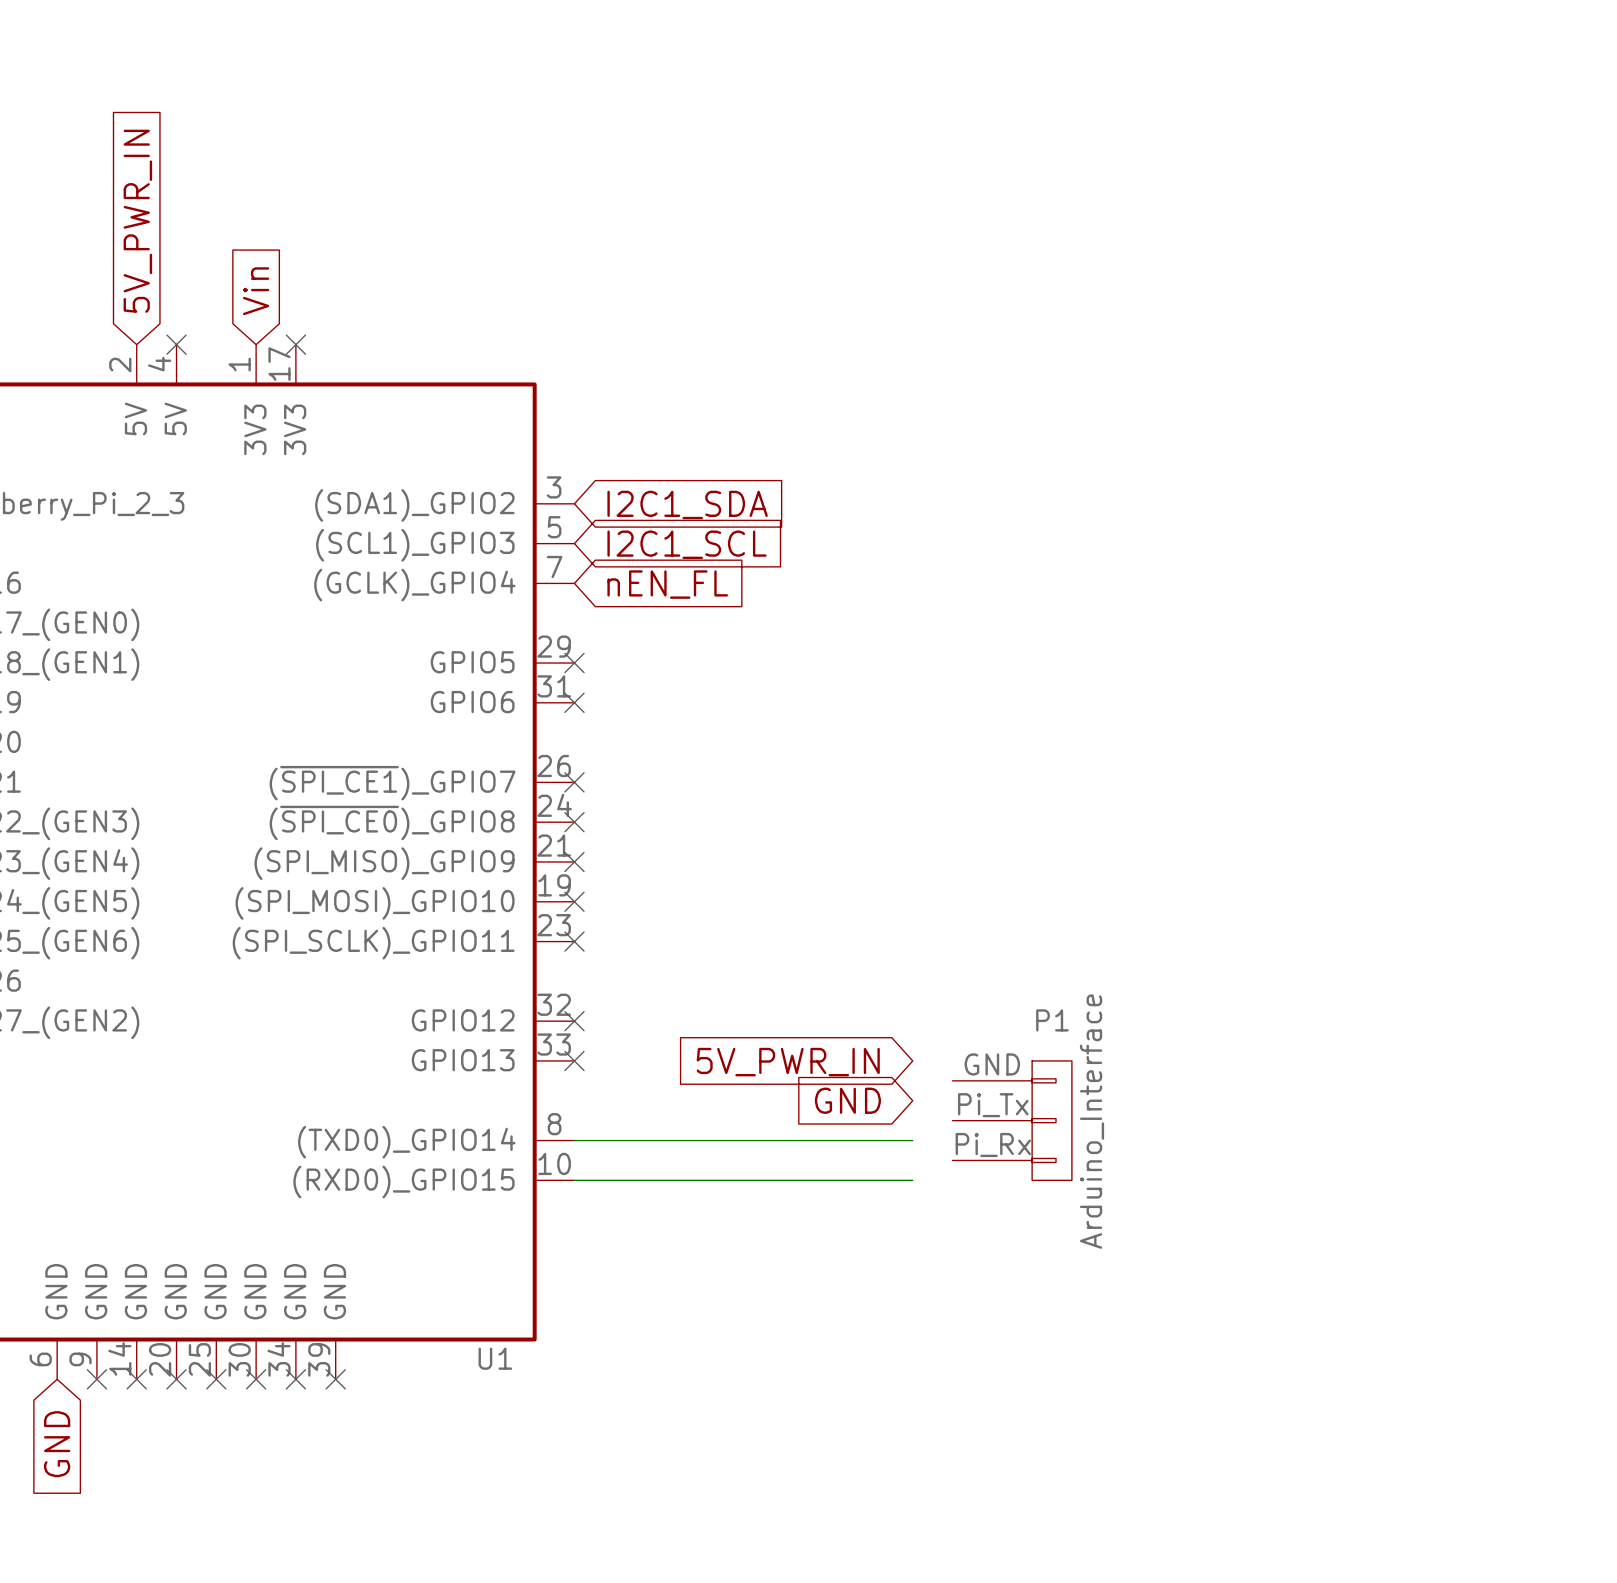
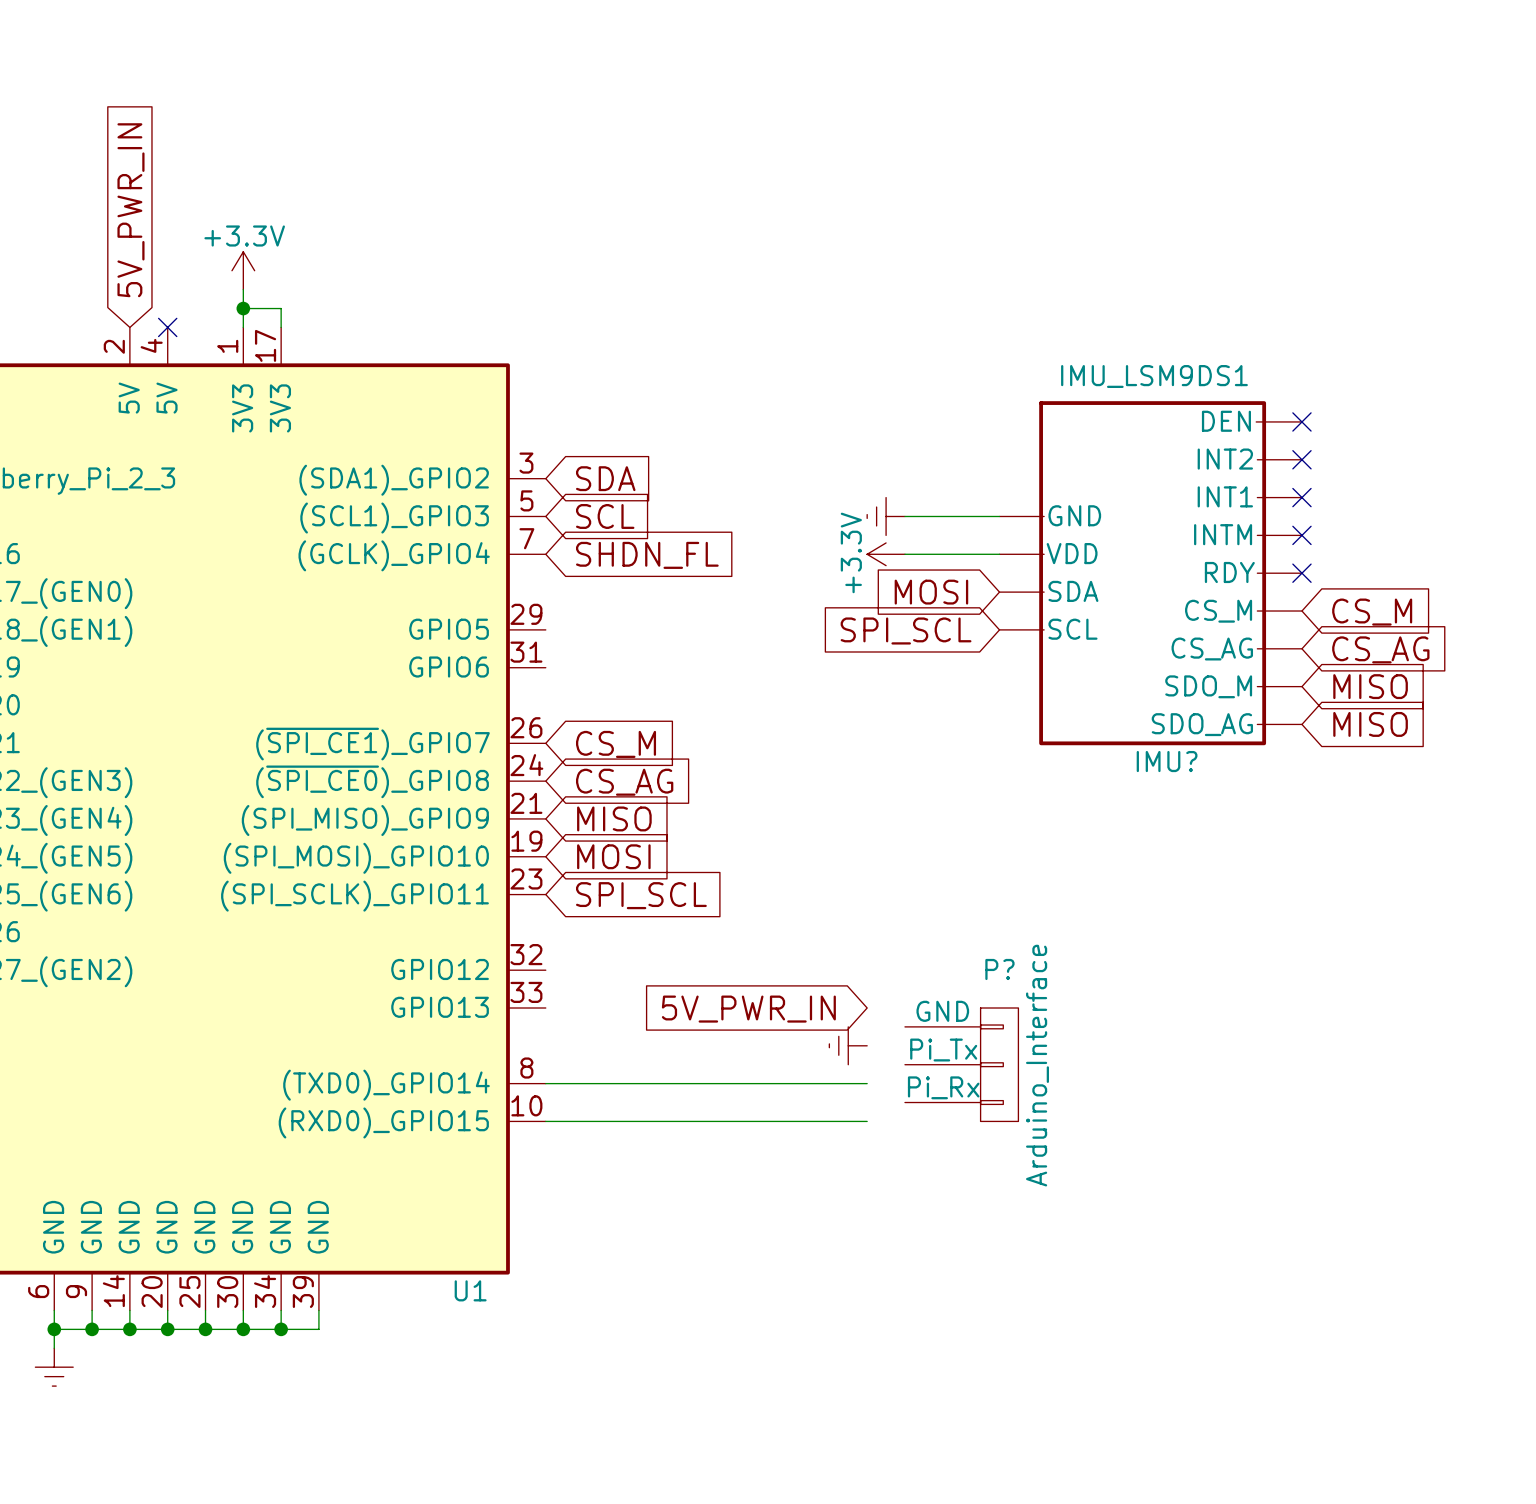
power symbol: none -> +3.3V (243, 270)
global label: Vin (256, 291) -> none
wire: none -> (243, 289) (243, 327)
wire: none -> (243, 308) (281, 308) (281, 327)
junction: none -> (243, 308)
no-connect mark: (295, 344) -> none
no-connect mark: none -> (1301, 421)
no-connect mark: none -> (1301, 459)
global label: I2C1_SDA (687, 504) -> SDA (605, 478)
no-connect mark: none -> (1301, 497)
power symbol: none -> (886, 516)
wire: none -> (904, 516) (999, 516)
global label: I2C1_SCL (687, 544) -> SCL (605, 516)
no-connect mark: none -> (1301, 535)
power symbol: none -> +3.3V (886, 554)
wire: none -> (904, 554) (999, 554)
global label: nEN_FL (667, 584) -> SHDN_FL (647, 555)
IMU?: none -> IMU_LSM9DS1 (1150, 573)
no-connect mark: none -> (1301, 573)
global label: none -> MOSI (931, 592)
global label: none -> CS_M (1372, 612)
no-connect mark: (574, 663) -> none
global label: none -> SPI_SCL (906, 630)
global label: none -> CS_AG (1380, 649)
no-connect mark: (574, 702) -> none
global label: none -> MISO (1370, 686)
global label: none -> MISO (1370, 724)
no-connect mark: (574, 782) -> none
global label: none -> CS_M (616, 744)
no-connect mark: (574, 822) -> none
global label: none -> CS_AG (624, 782)
no-connect mark: (574, 861) -> none
global label: none -> MISO (614, 818)
no-connect mark: (574, 901) -> none
global label: none -> MOSI (613, 856)
no-connect mark: (574, 941) -> none
global label: none -> SPI_SCL (641, 895)
P1 name: P1 (1052, 1020) -> P? (999, 969)
no-connect mark: (574, 1021) -> none
no-connect mark: (574, 1060) -> none
global label: GND (847, 1100) -> none
power symbol: none -> (848, 1045)
wire: none -> (54, 1310) (54, 1348)
wire: none -> (92, 1310) (92, 1329)
no-connect mark: (96, 1379) -> none
wire: none -> (129, 1310) (129, 1329)
no-connect mark: (136, 1379) -> none
wire: none -> (167, 1310) (167, 1329)
no-connect mark: (176, 1379) -> none
wire: none -> (205, 1310) (205, 1329)
no-connect mark: (216, 1379) -> none
wire: none -> (243, 1310) (243, 1329)
no-connect mark: (256, 1379) -> none
wire: none -> (281, 1310) (281, 1329)
no-connect mark: (295, 1379) -> none
wire: none -> (318, 1310) (318, 1329) (54, 1329)
no-connect mark: (335, 1379) -> none
junction: none -> (54, 1329)
junction: none -> (92, 1329)
junction: none -> (129, 1329)
junction: none -> (167, 1329)
junction: none -> (205, 1329)
junction: none -> (243, 1329)
junction: none -> (281, 1329)
power symbol: none -> (54, 1367)
global label: GND (57, 1444) -> none

